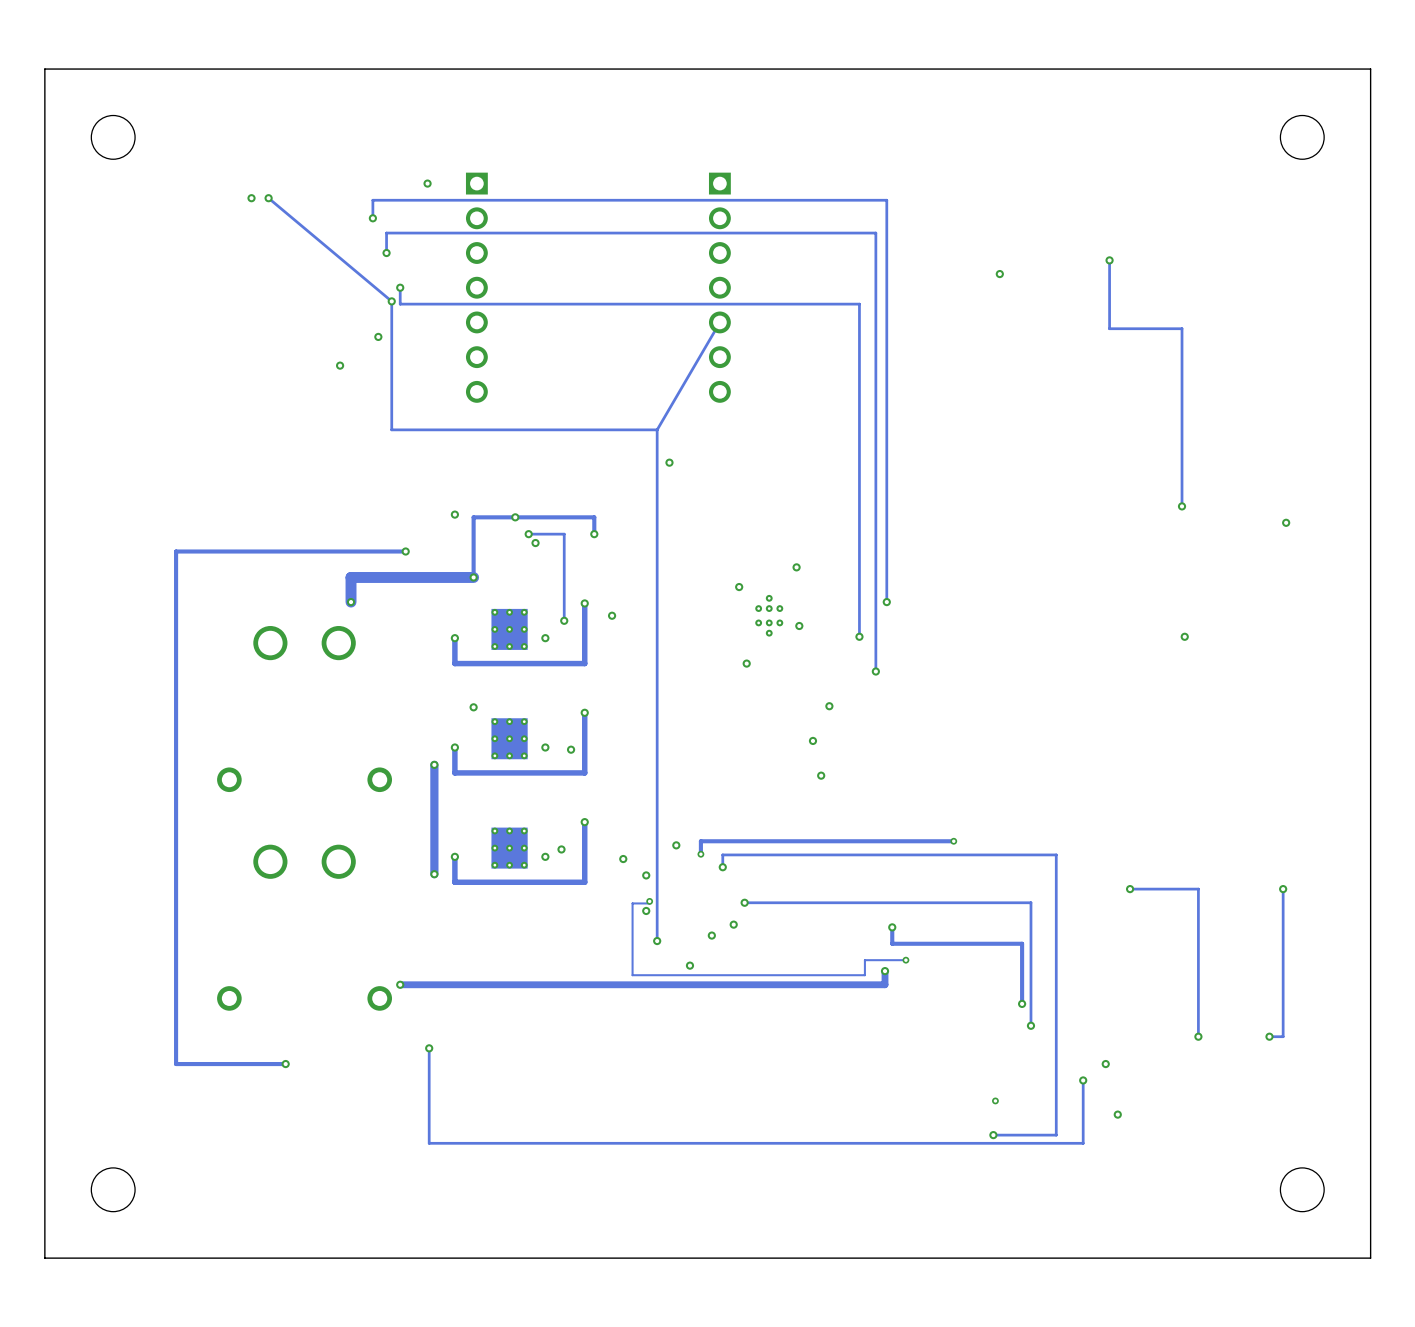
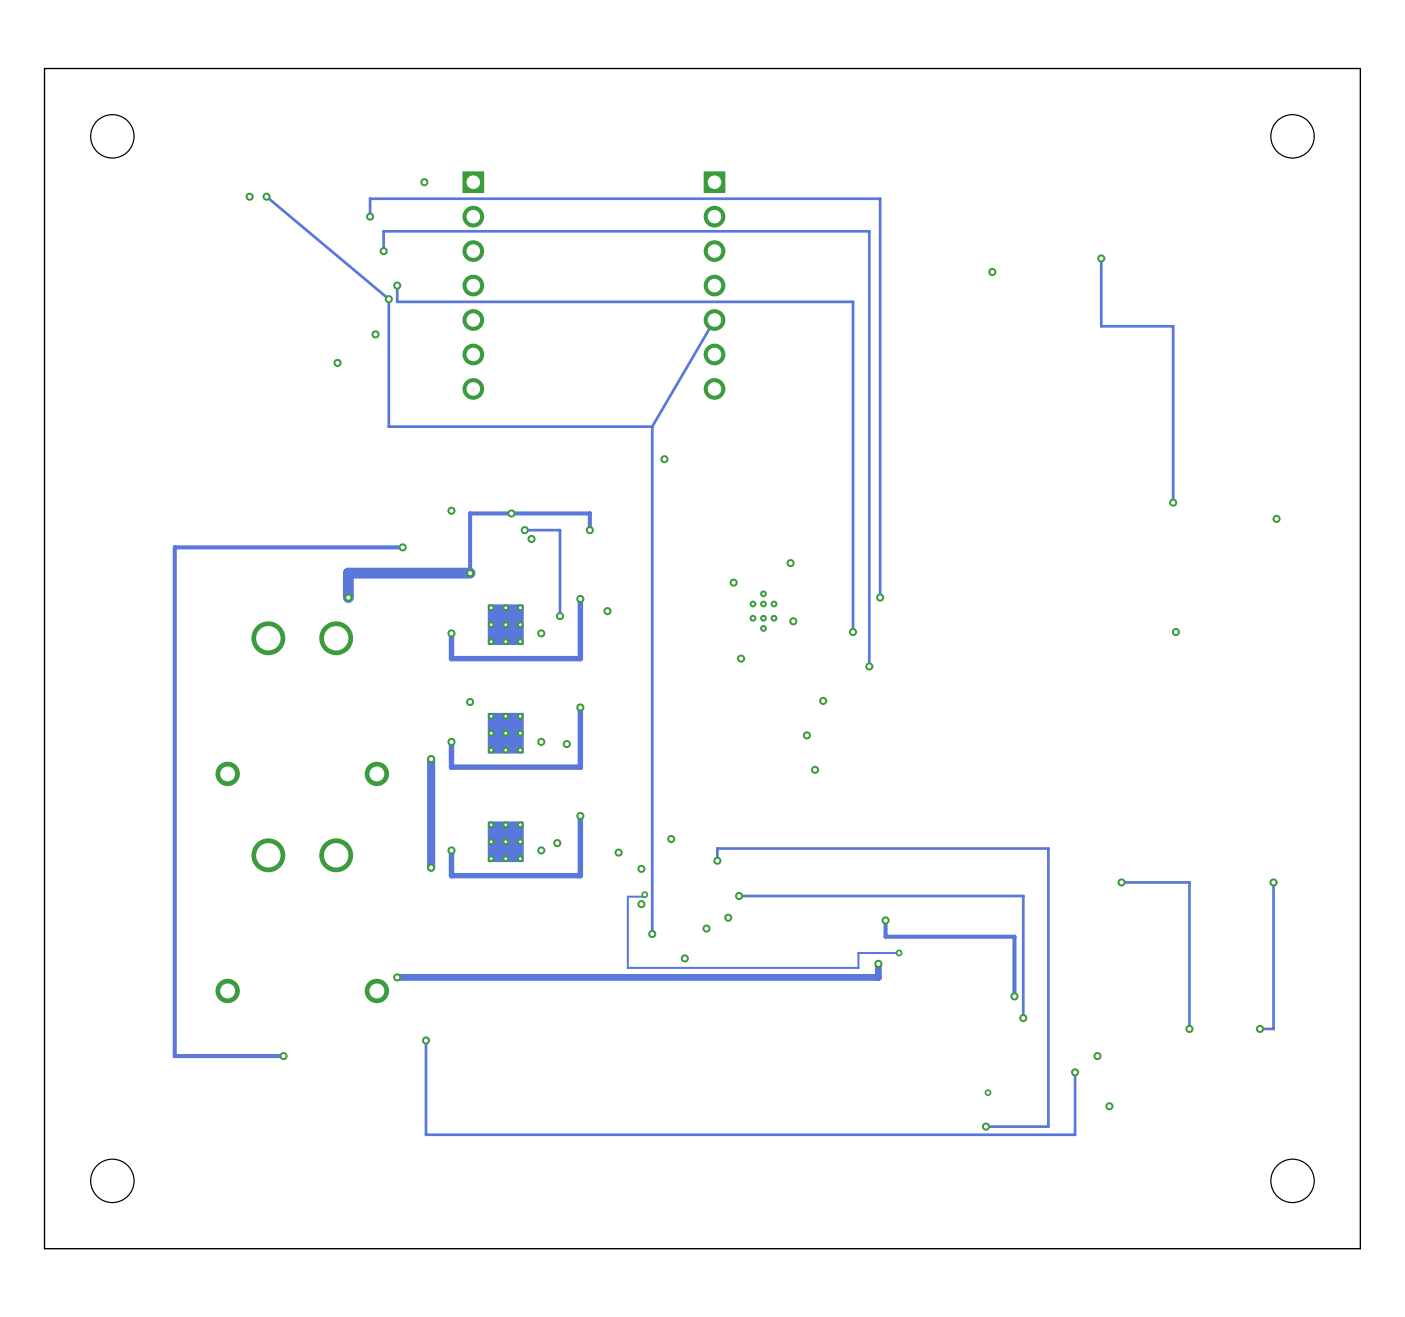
track: (953, 841) (700, 841) (700, 854) -> none
via: (953, 841) -> none
via: (700, 854) -> none

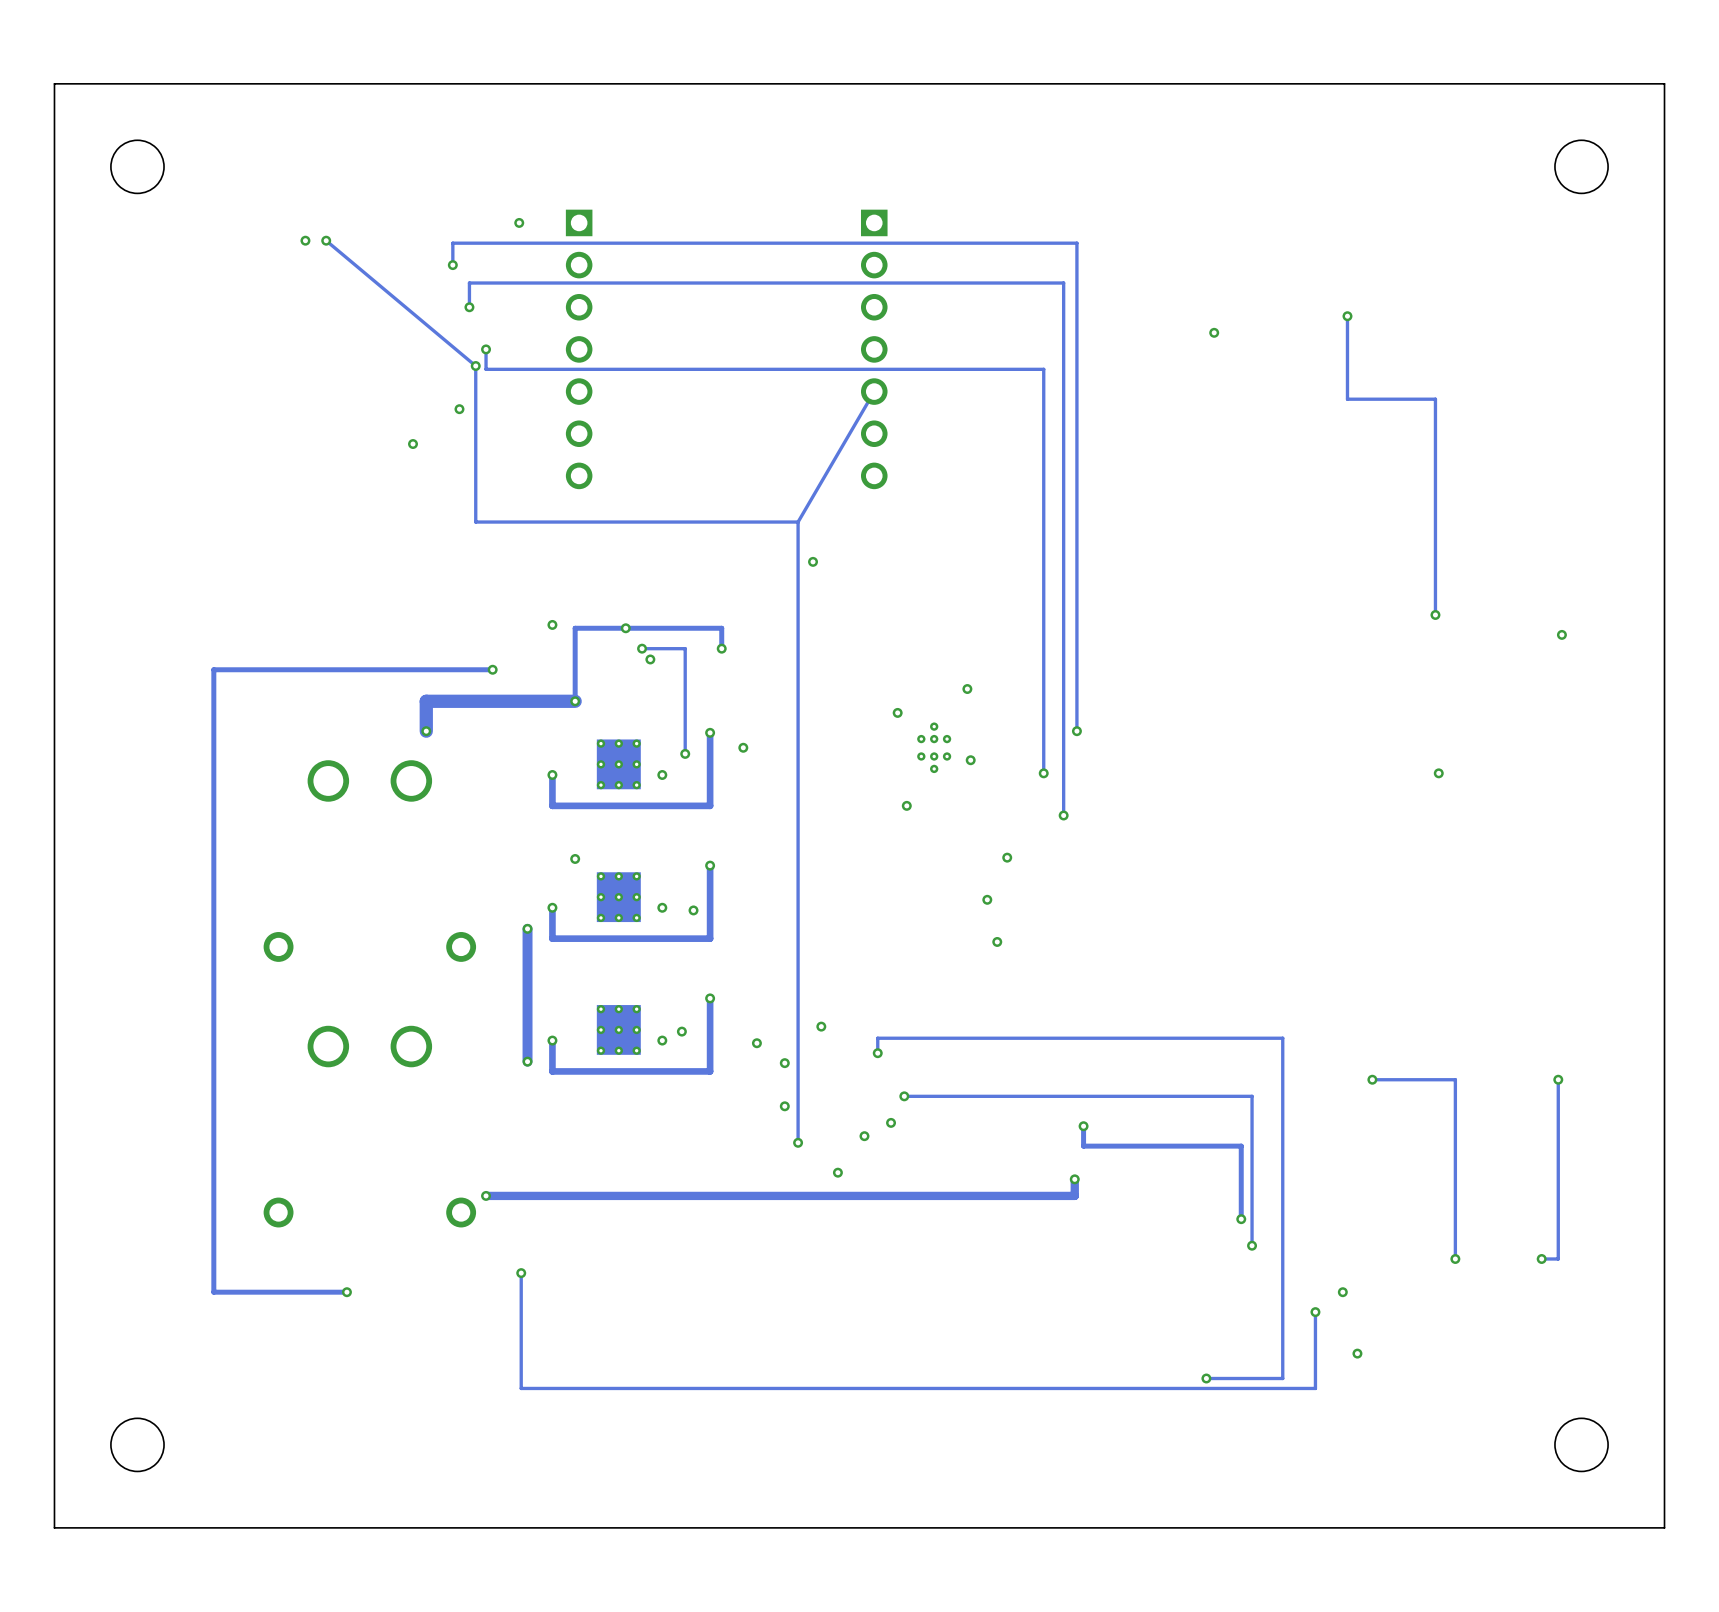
track: (644, 894) (644, 896) (627, 896) (627, 967) (858, 967) (858, 952) (899, 952) -> none
via: (644, 894) -> none
via: (899, 952) -> none
via: (987, 1092) -> none

